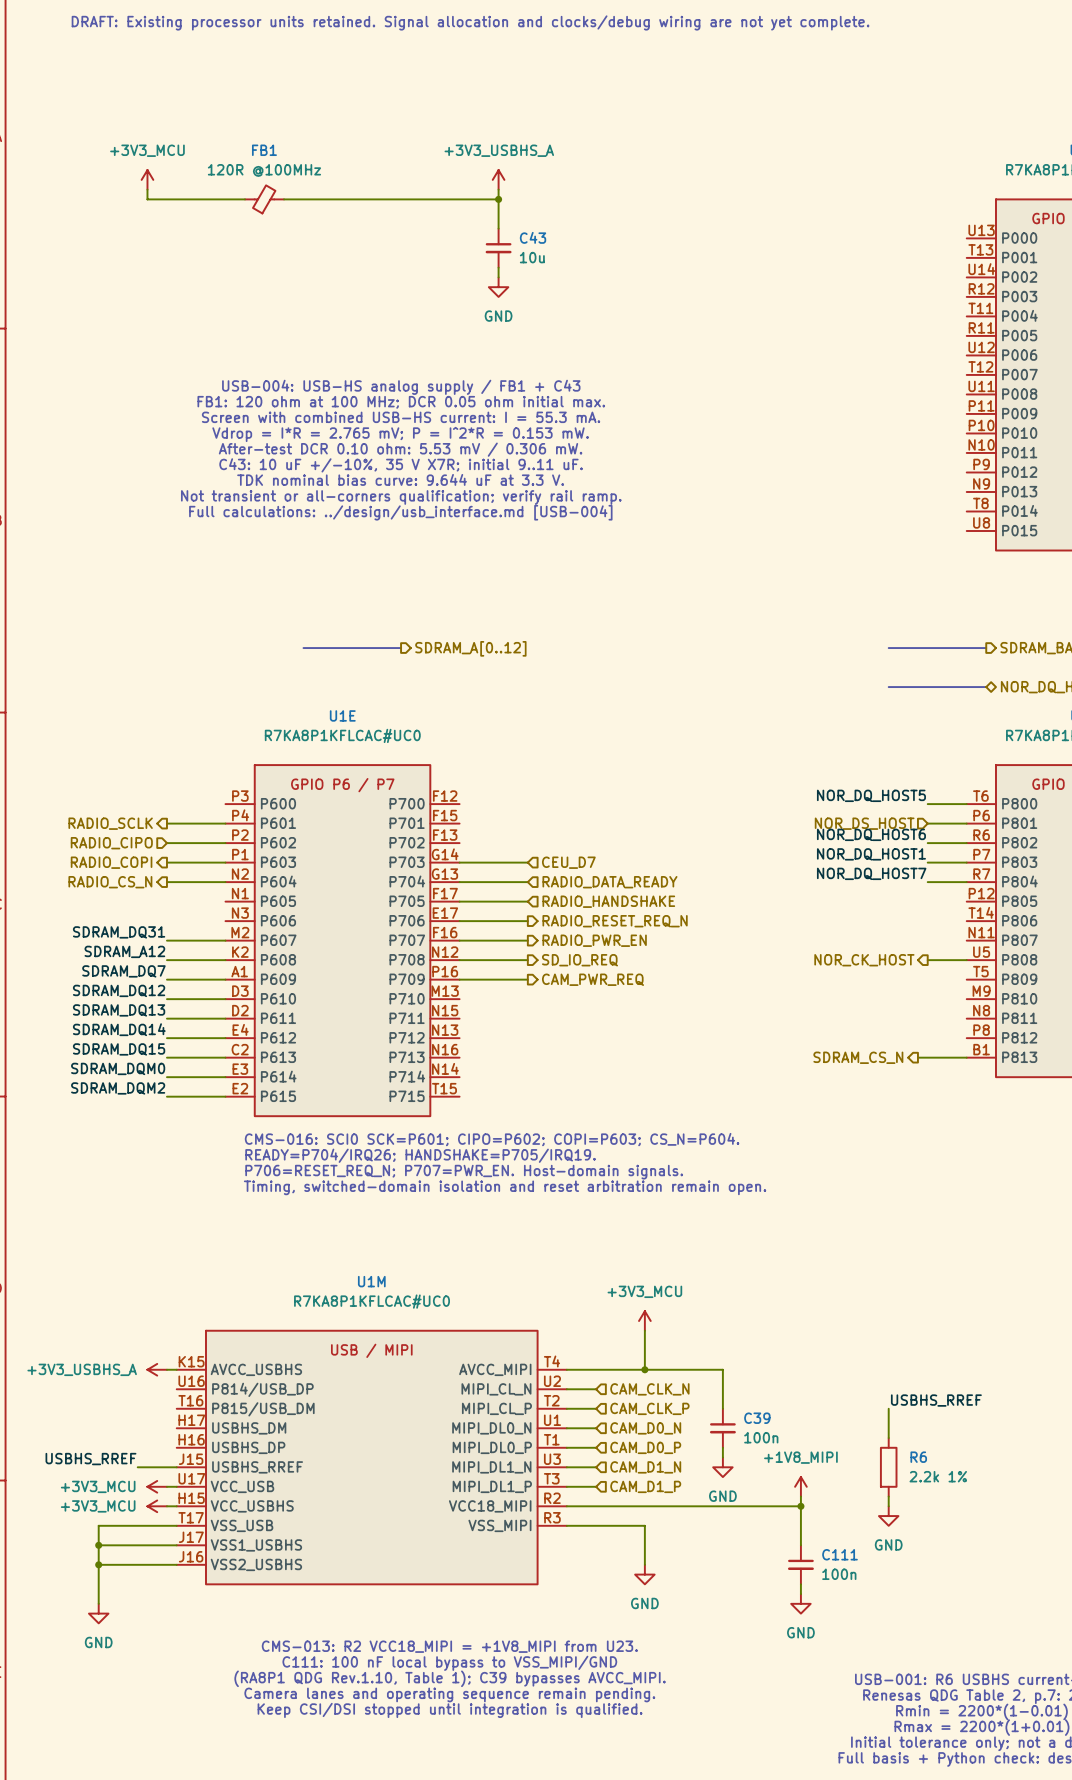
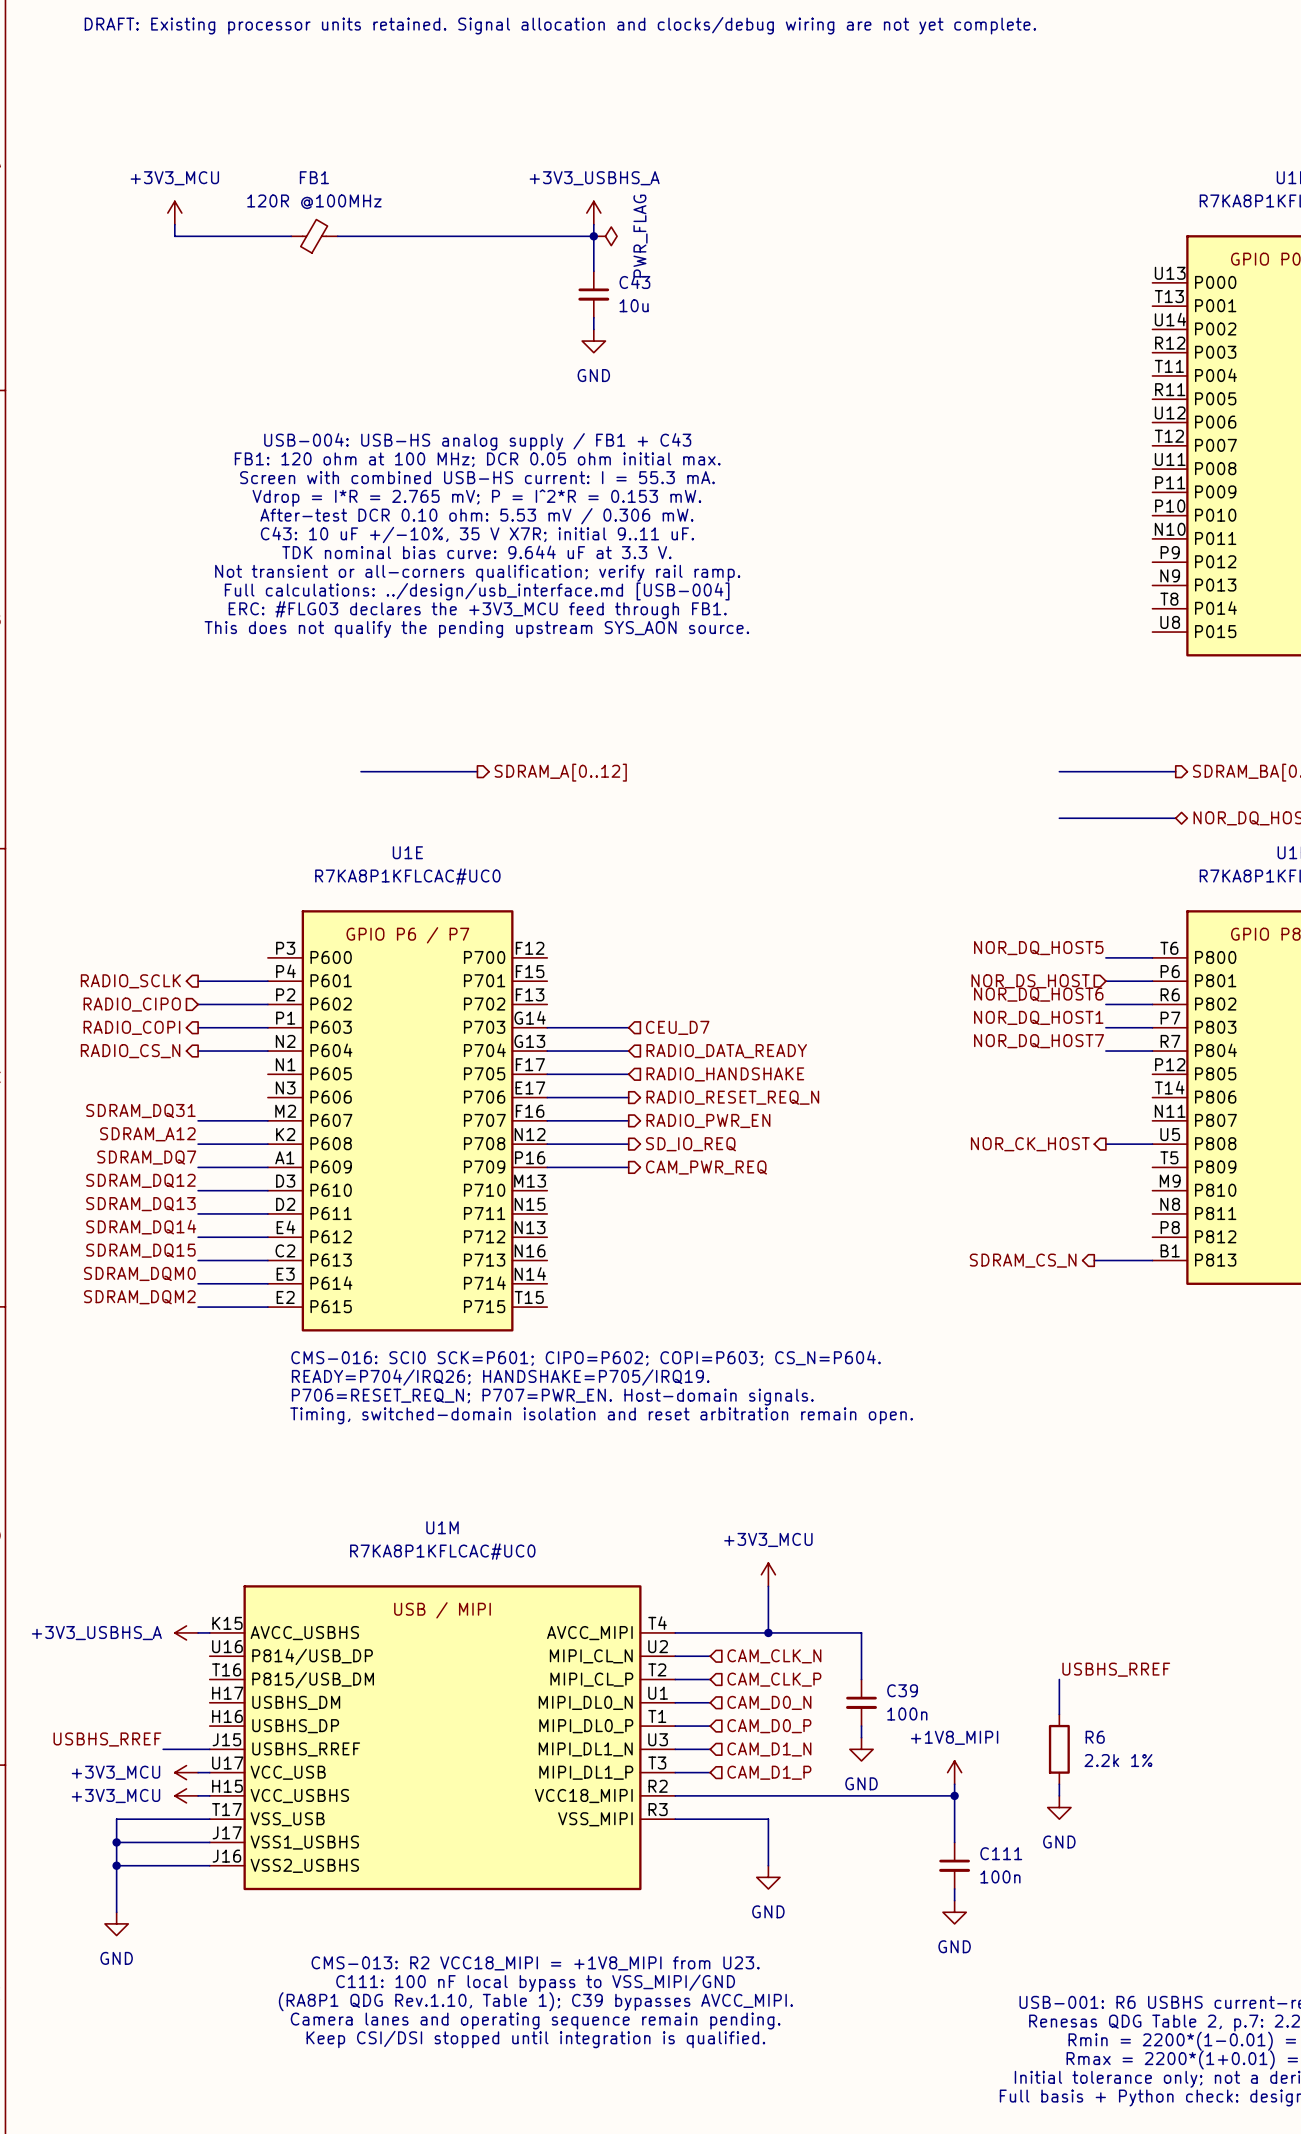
power symbol: none -> PWR_FLAG (605, 236)
text: none -> USB-004: USB-HS analog supply / FB1 + C43 (477, 441)
text: USB-004: USB-HS analog supply / FB1 + C43 (401, 387) -> FB1: 120 ohm at 100 MHz; DCR 0.05 ohm initial max. (477, 459)
text: FB1: 120 ohm at 100 MHz; DCR 0.05 ohm initial max. (401, 402) -> Screen with combined USB-HS current: I = 55.3 mA. (477, 477)
text: Screen with combined USB-HS current: I = 55.3 mA. (401, 417) -> Vdrop = I*R = 2.765 mV; P = I^2*R = 0.153 mW. (476, 498)
text: Vdrop = I*R = 2.765 mV; P = I^2*R = 0.153 mW. (400, 434) -> After-test DCR 0.10 ohm: 5.53 mV / 0.306 mW. (476, 516)
text: After-test DCR 0.10 ohm: 5.53 mV / 0.306 mW. (400, 449) -> C43: 10 uF +/-10%, 35 V X7R; initial 9..11 uF. (477, 534)
text: C43: 10 uF +/-10%, 35 V X7R; initial 9..11 uF. (401, 465) -> TDK nominal bias curve: 9.644 uF at 3.3 V. (476, 552)
text: TDK nominal bias curve: 9.644 uF at 3.3 V. (400, 479) -> Not transient or all-corners qualification; verify rail ramp. (477, 573)
text: Not transient or all-corners qualification; verify rail ramp. (401, 497) -> Full calculations: ../design/usb_interface.md [USB-004] (477, 591)
text: Full calculations: ../design/usb_interface.md [USB-004] (400, 512) -> ERC: #FLG03 declares the +3V3_MCU feed through FB1. (477, 610)
text: none -> This does not qualify the pending upstream SYS_AON source. (476, 629)

